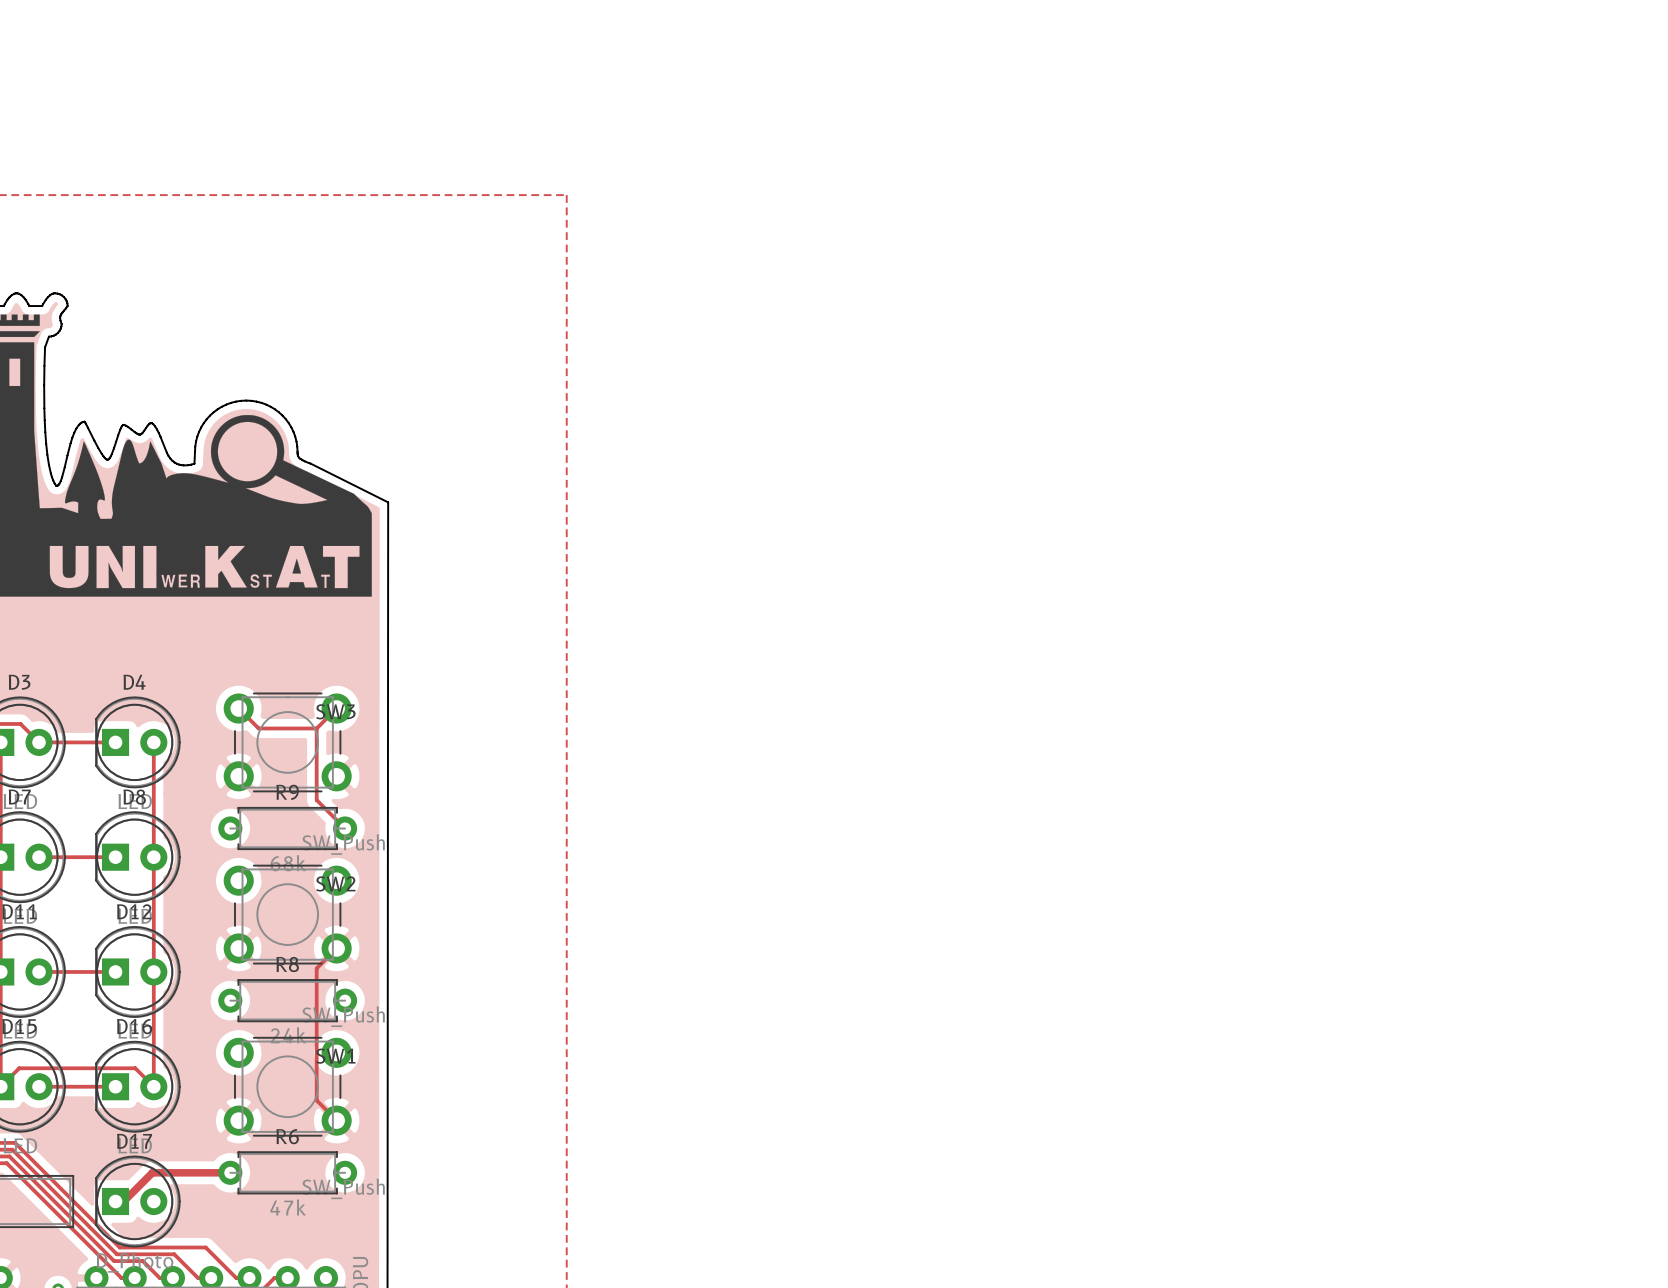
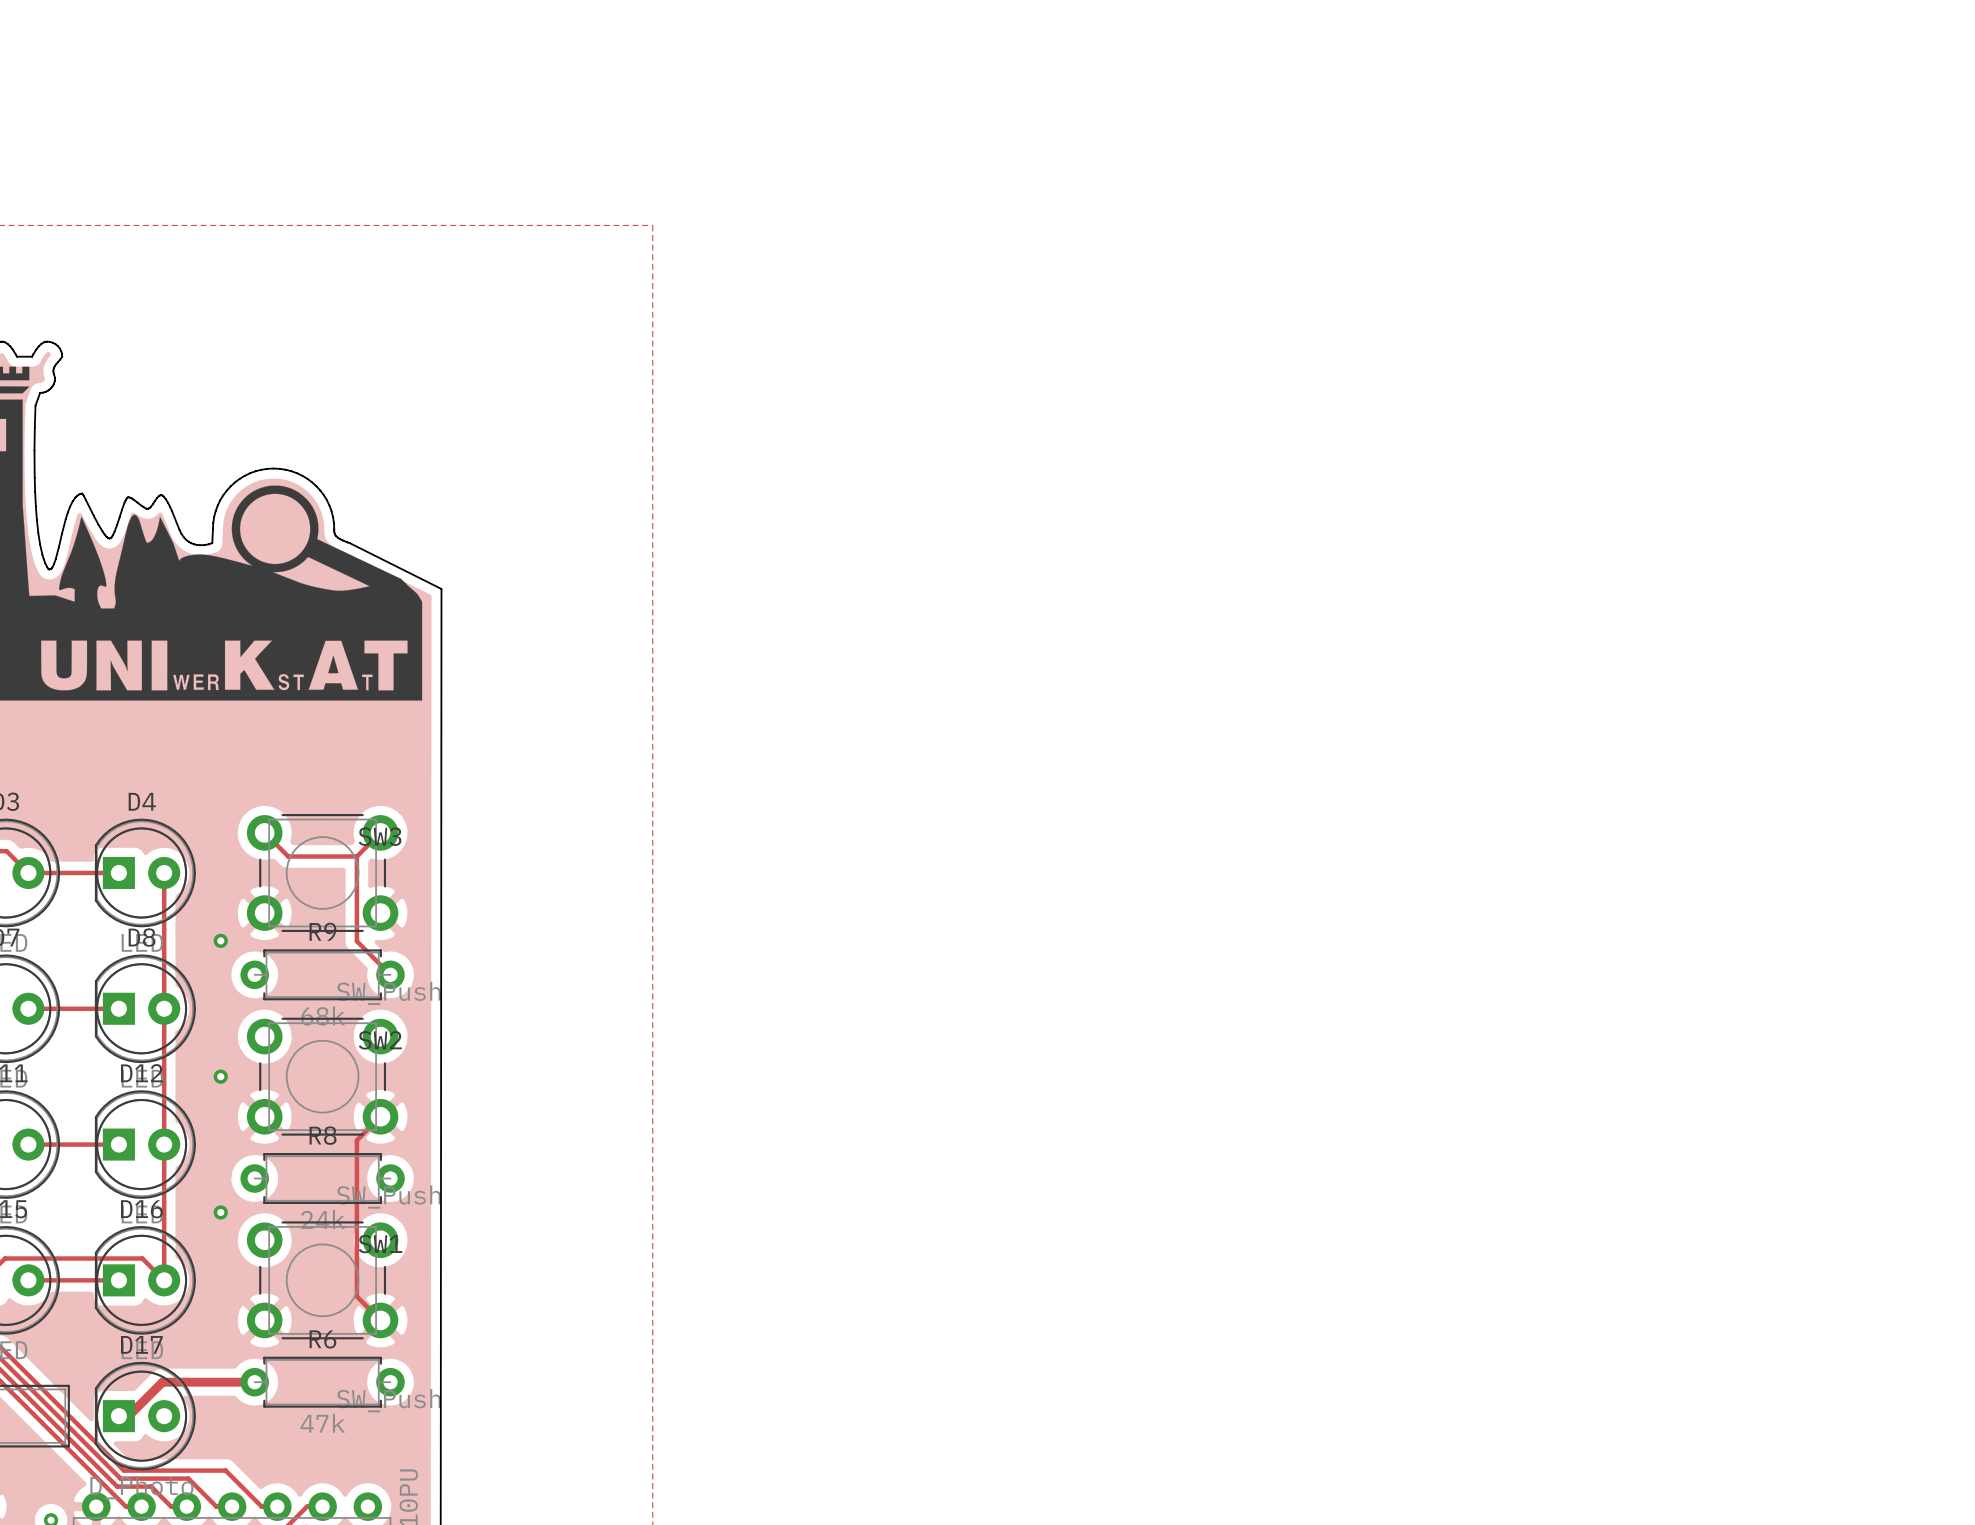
via: none -> (220, 940)
via: none -> (220, 1076)
via: none -> (220, 1212)

